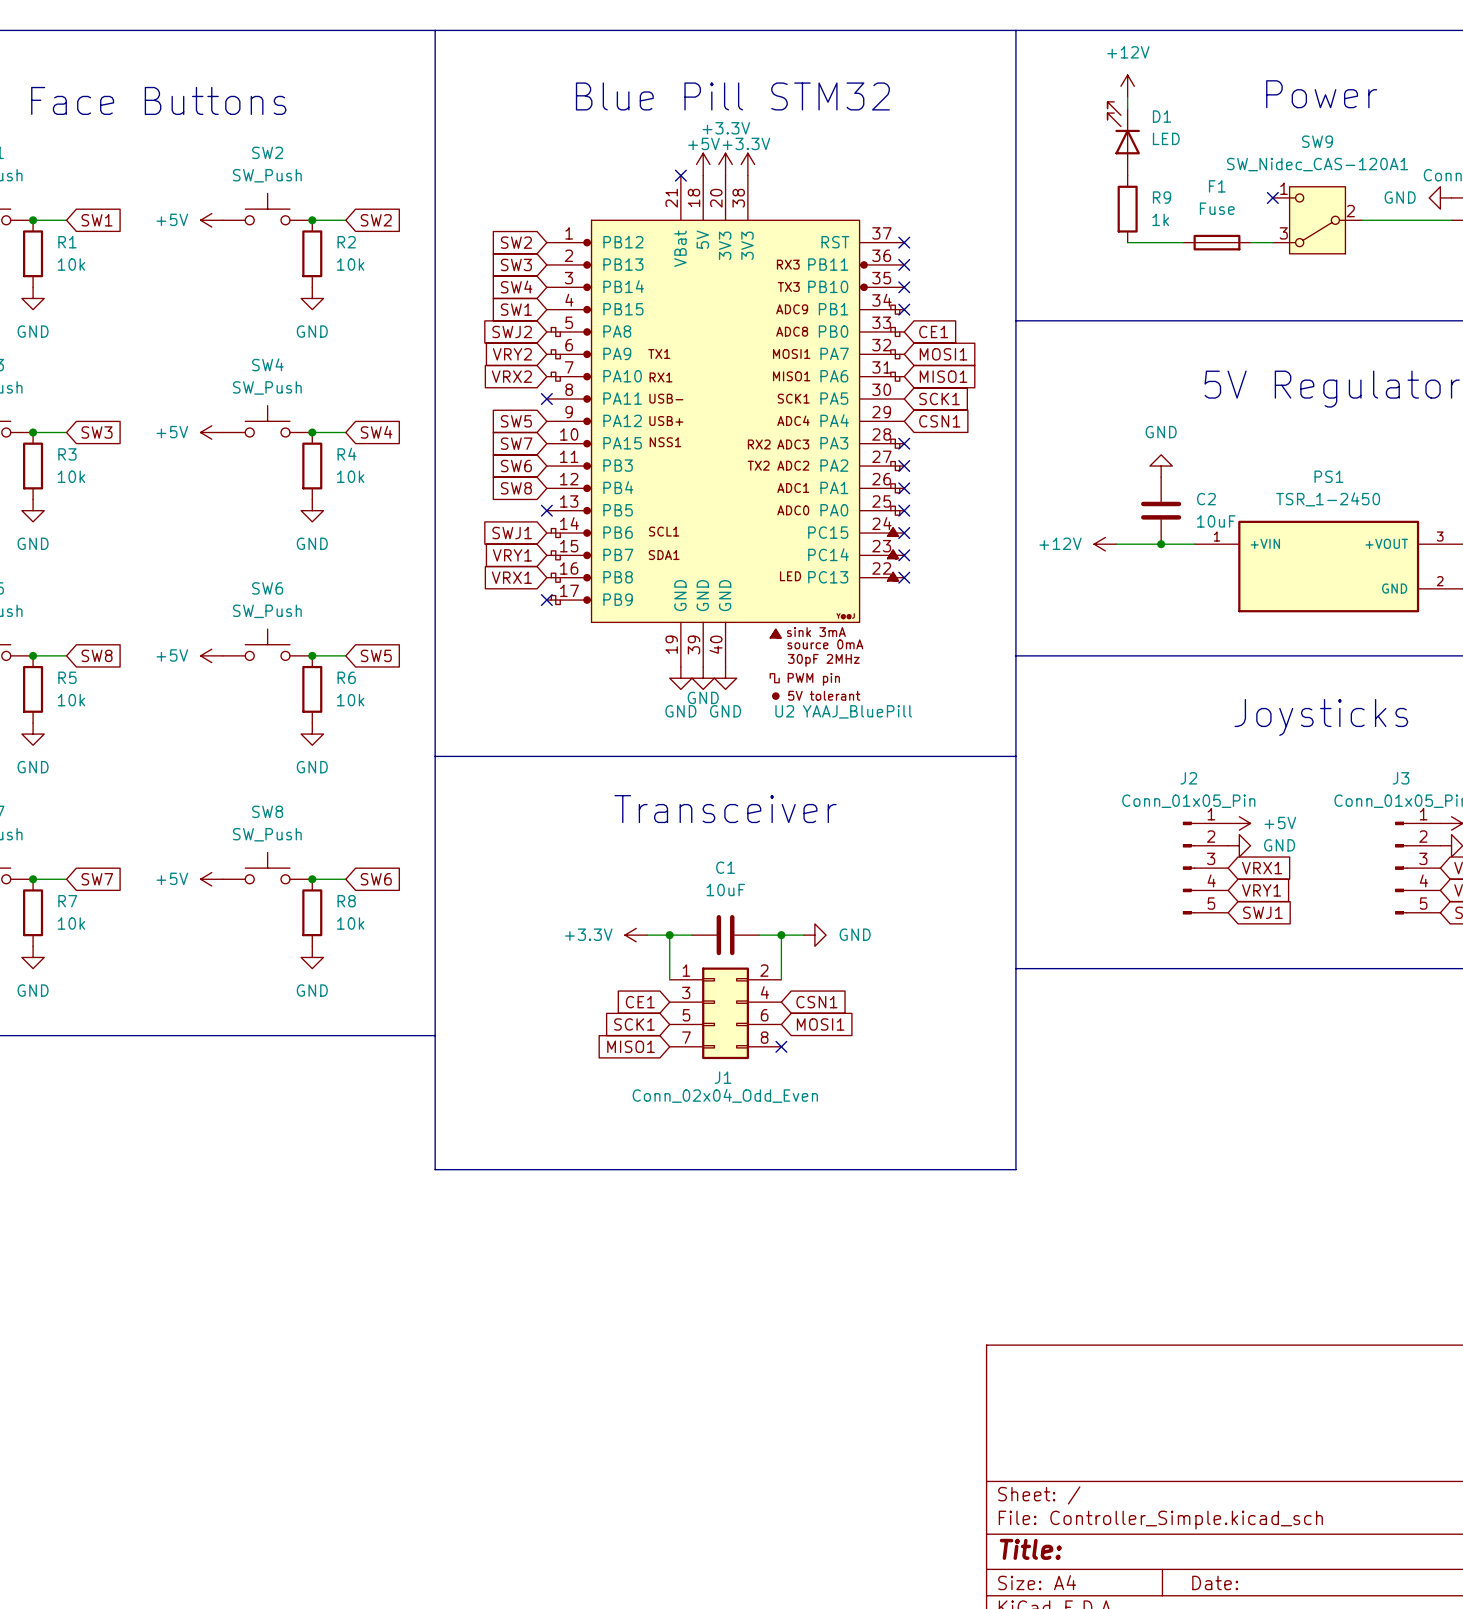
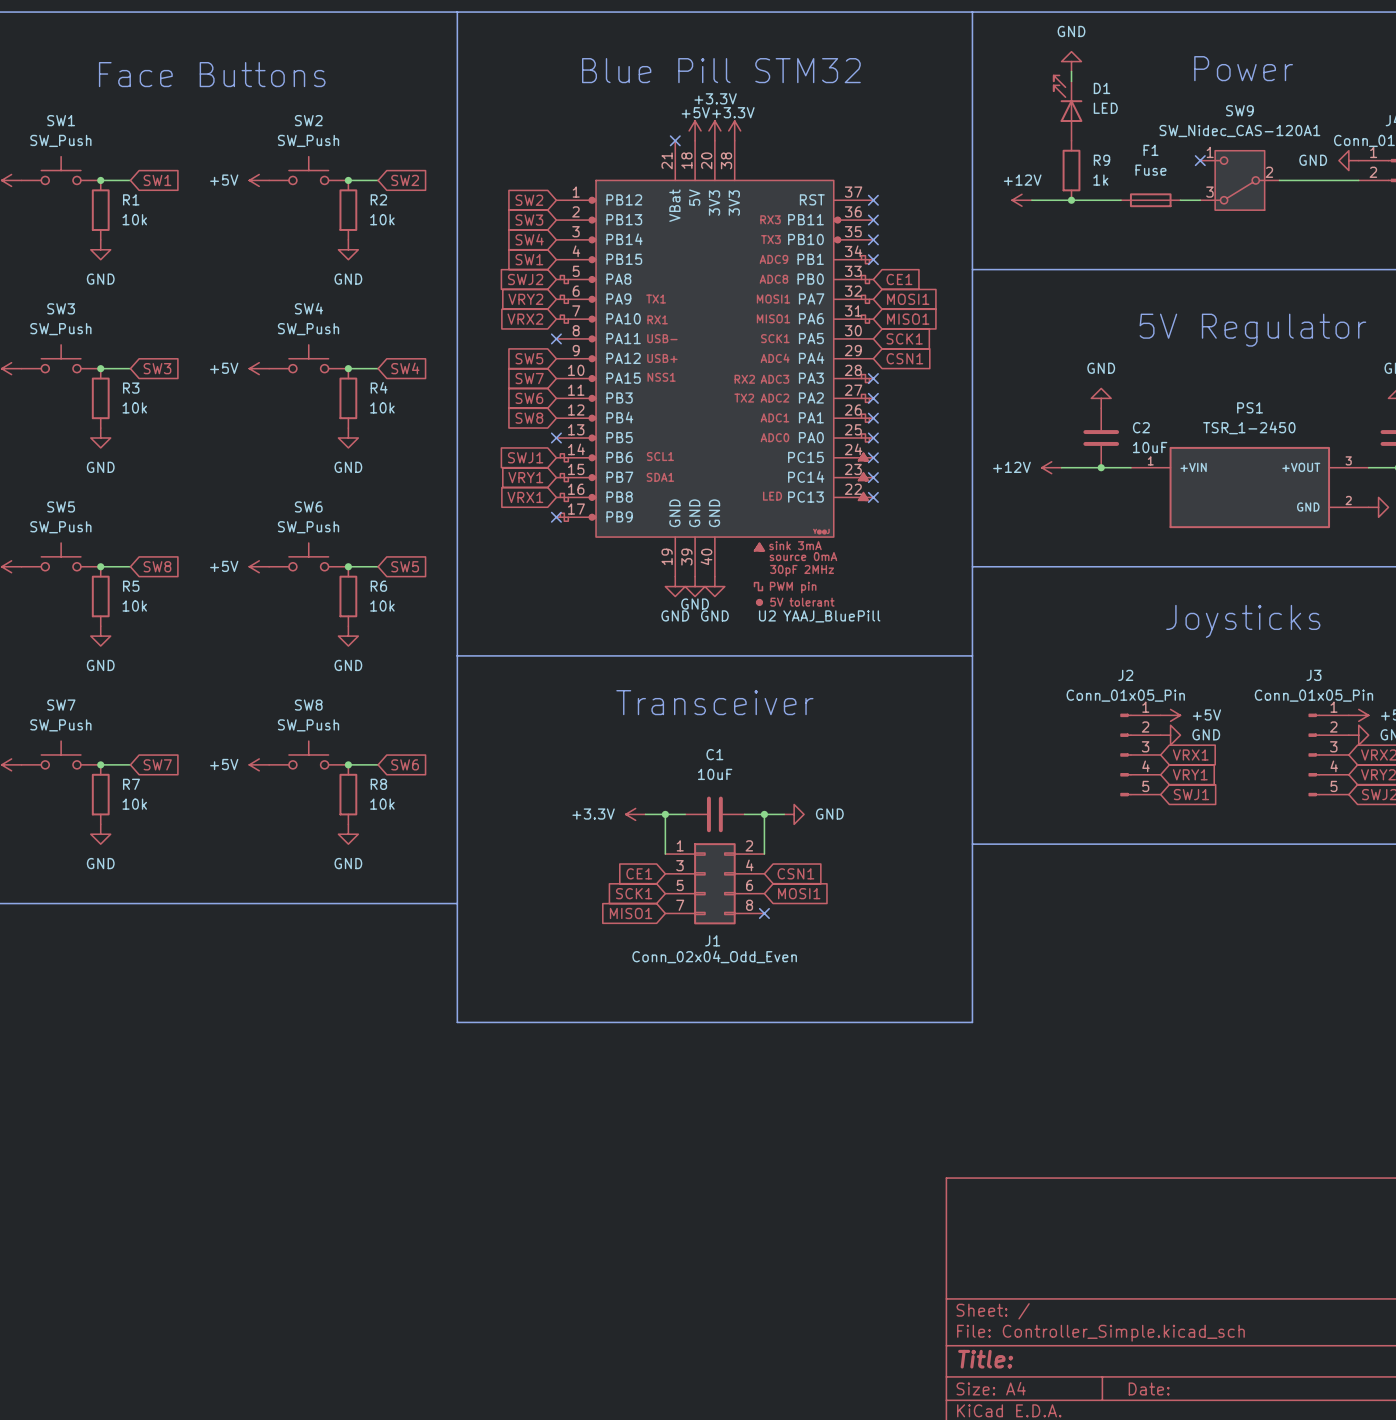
power symbol: +12V (1127, 86) -> GND (1071, 61)
power symbol: none -> +12V (1021, 200)
wire: none -> (1031, 200) (1071, 200)
junction: none -> (1071, 200)

